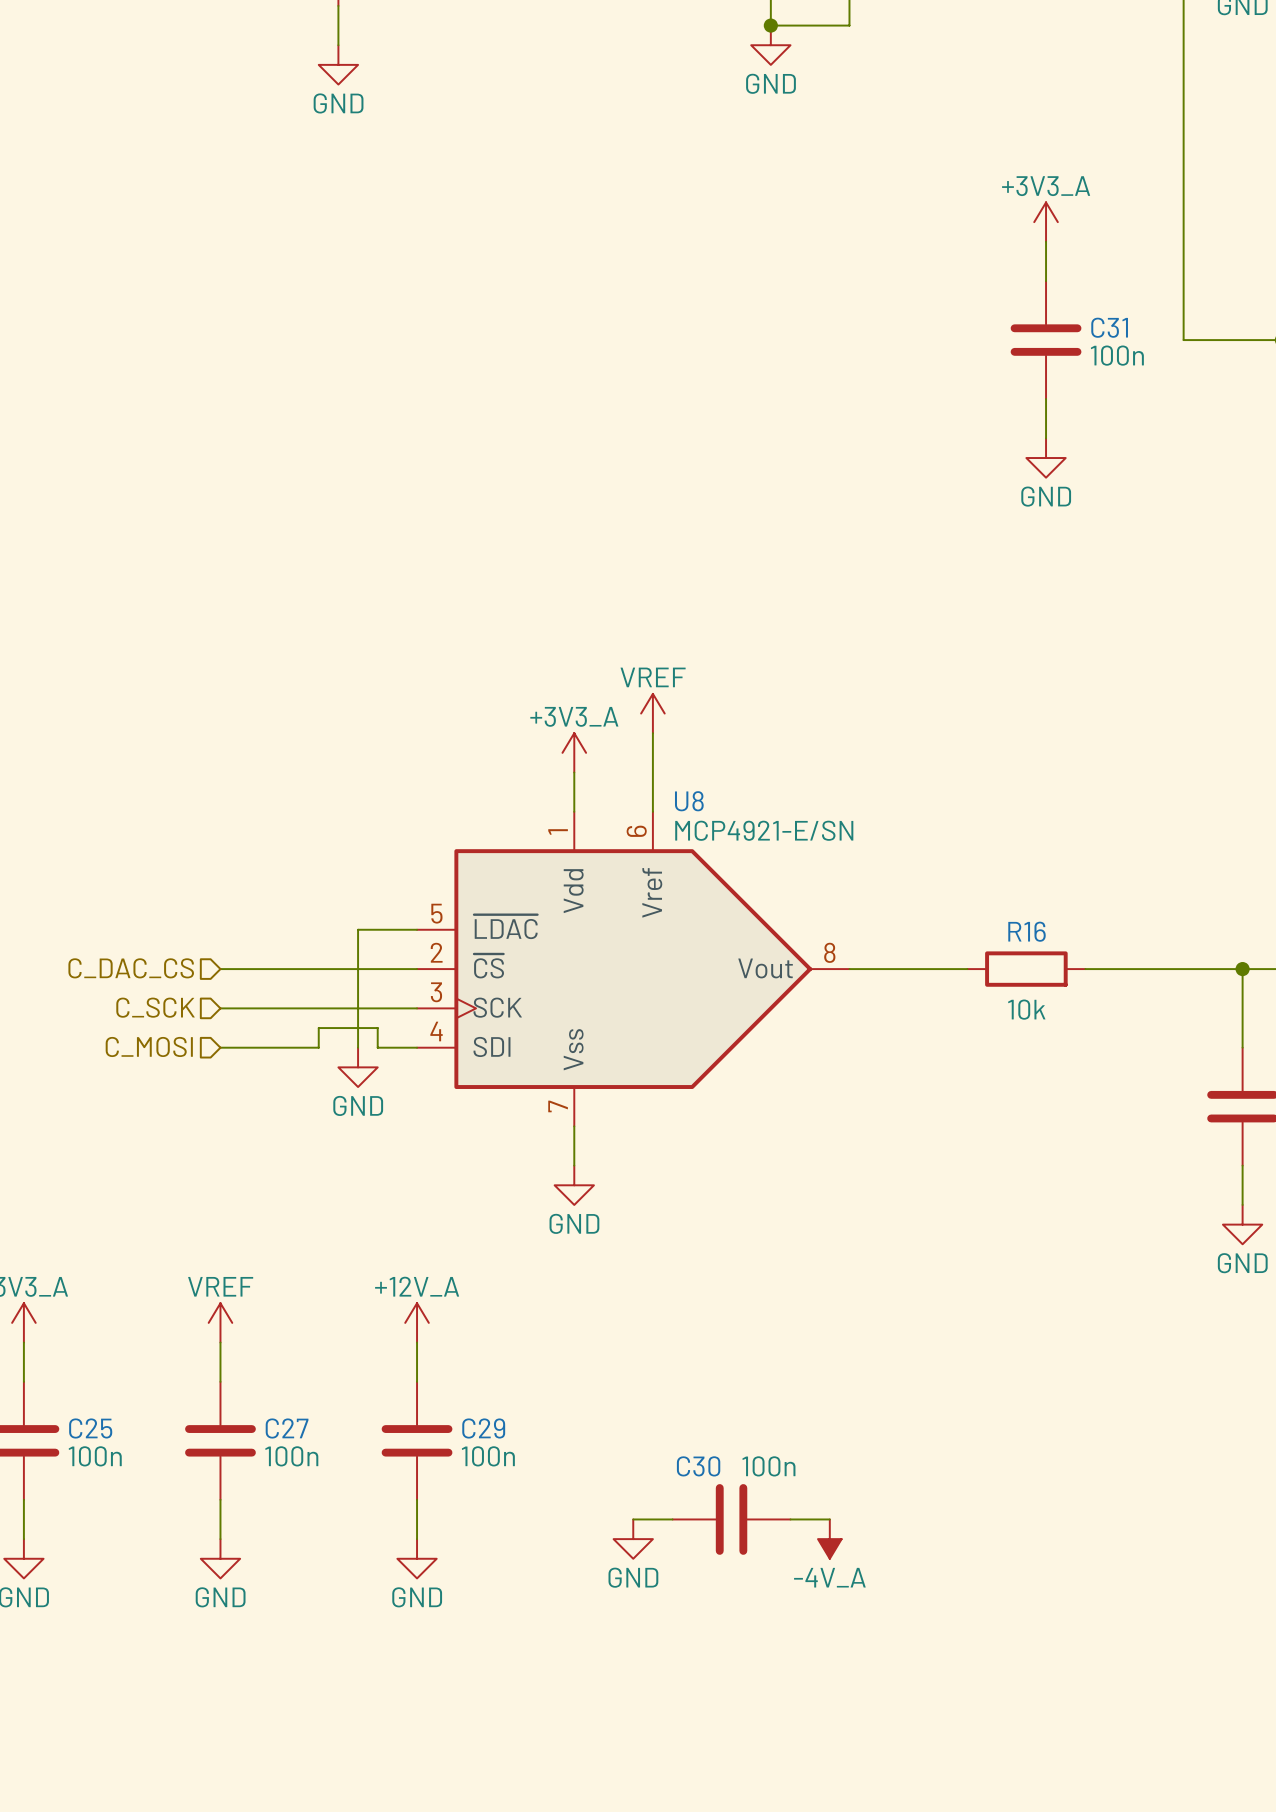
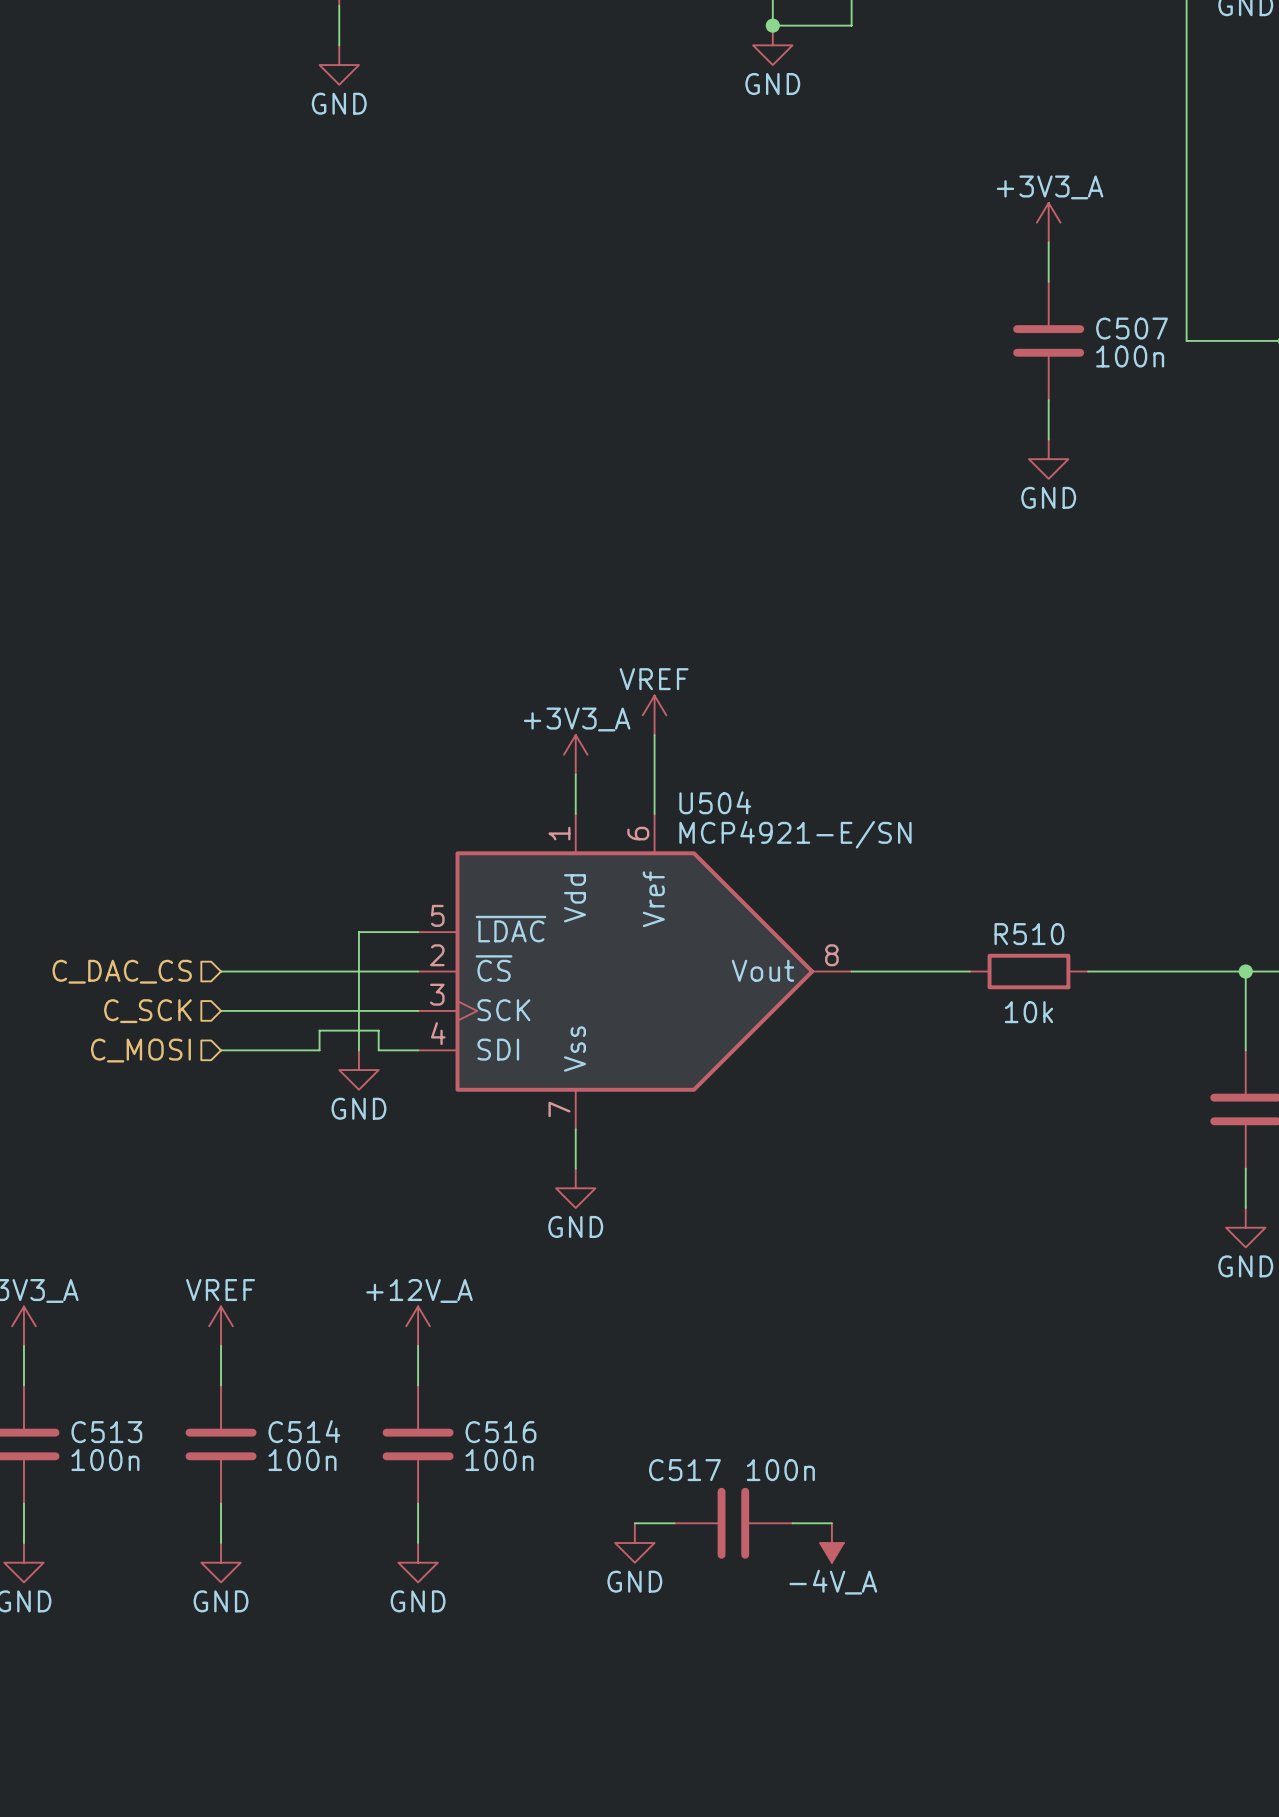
C31 name: C31 (1109, 327) -> C507 (1132, 328)
U8 name: U8 (689, 801) -> U504 (715, 802)
R16 name: R16 (1027, 931) -> R510 (1029, 934)
C25 name: C25 (90, 1428) -> C513 (106, 1432)
C27 name: C27 (287, 1428) -> C514 (304, 1431)
C29 name: C29 (483, 1428) -> C516 (500, 1432)
C30 name: C30 (698, 1466) -> C517 (684, 1470)

